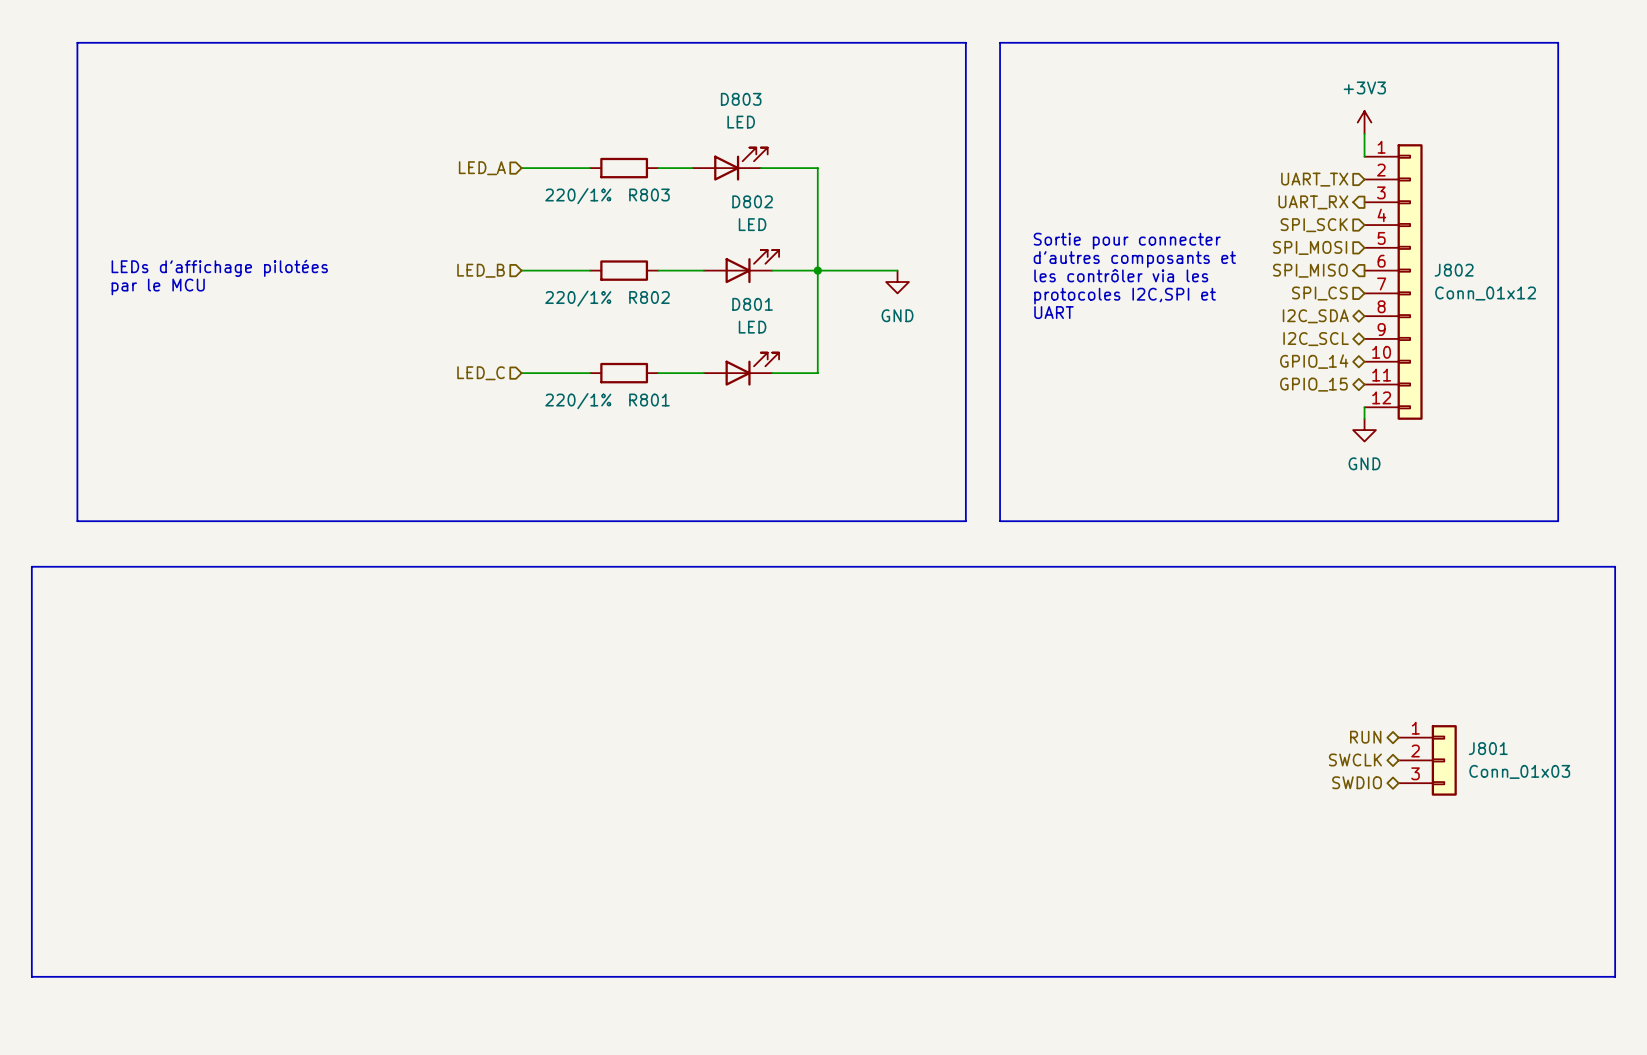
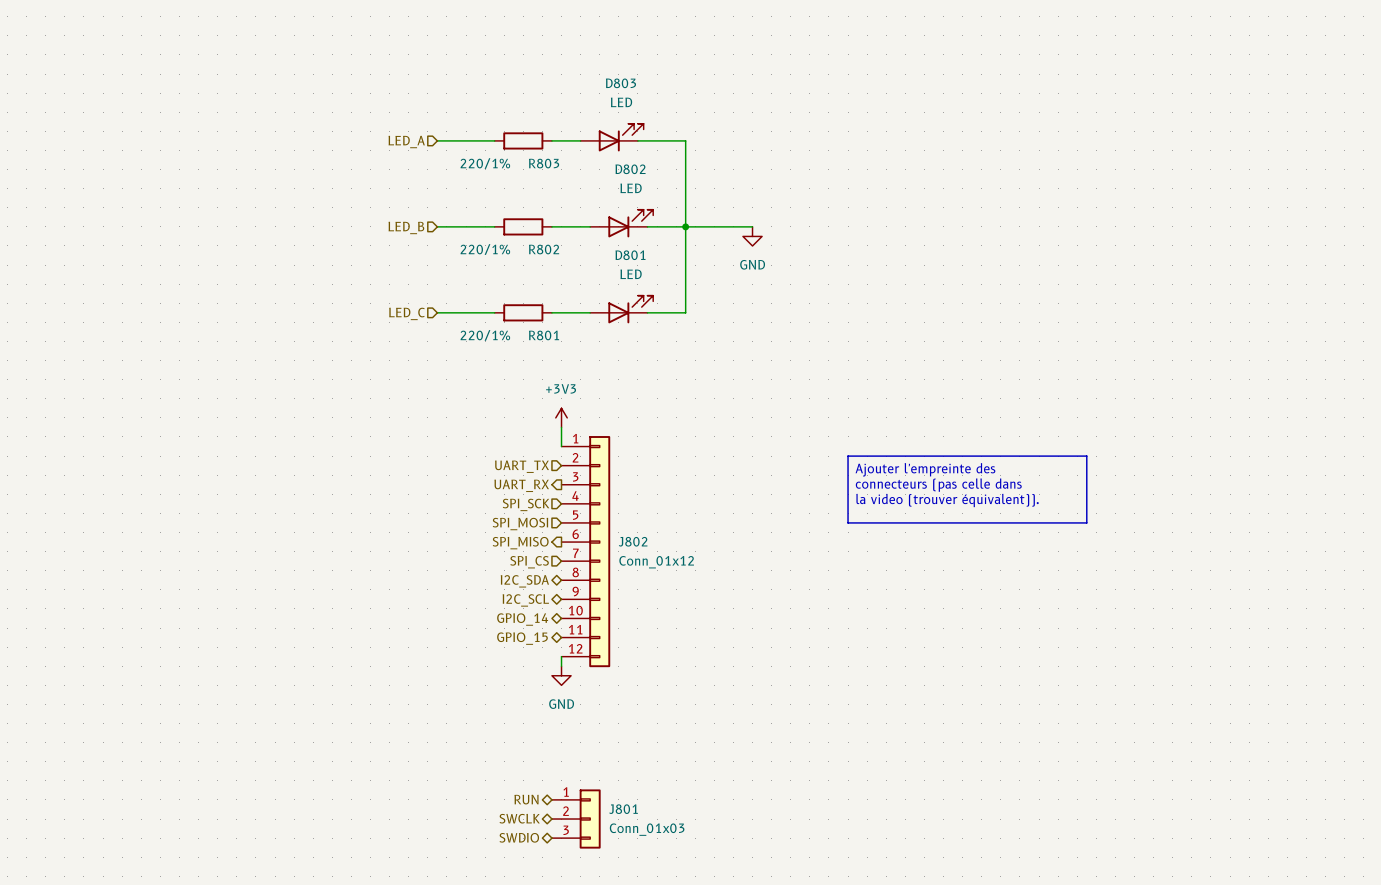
line: (77, 42) (965, 42) (965, 521) (77, 521) (77, 42) -> none
line: (1000, 42) (1558, 42) (1558, 521) (1000, 521) (1000, 42) -> none
power symbol: +3V3 (1364, 122) -> none
wire: (1364, 133) (1364, 156) -> none
hierarchical label: UART_TX (1314, 179) -> none
hierarchical label: UART_RX (1313, 202) -> none
hierarchical label: SPI_SCK (1314, 225) -> none
text: Sortie pour connecter (1127, 241) -> none
hierarchical label: SPI_MOSI (1310, 247) -> none
text: d'autres composants et (1134, 259) -> none
text: LEDs d'affichage pilotées (219, 268) -> none
hierarchical label: SPI_MISO (1310, 270) -> none
text: les contrôler via les (1121, 275) -> none
J802 position: (1393, 282) -> (585, 551)
text: par le MCU (158, 286) -> none
hierarchical label: SPI_CS (1319, 293) -> none
text: protocoles I2C,SPI et (1125, 296) -> none
text: UART (1053, 312) -> none
hierarchical label: I2C_SDA (1315, 316) -> none
hierarchical label: I2C_SCL (1316, 339) -> none
hierarchical label: GPIO_14 (1314, 361) -> none
hierarchical label: GPIO_15 (1313, 384) -> none
wire: (1364, 407) (1364, 418) -> none
power symbol: GND (1364, 430) -> none
power symbol: none -> +3V3 (561, 417)
wire: none -> (561, 427) (561, 446)
line: none -> (848, 456) (1086, 456) (1086, 522) (848, 522) (848, 456)
hierarchical label: none -> UART_TX (522, 466)
text: none -> Ajouter l'empreinte des (925, 469)
line: (31, 566) (1615, 566) (1615, 976) (31, 976) (31, 566) -> none
hierarchical label: none -> UART_RX (521, 485)
text: none -> connecteurs (pas celle dans (938, 485)
text: none -> la video (trouver équivalent)). (947, 500)
hierarchical label: none -> SPI_SCK (526, 504)
hierarchical label: none -> SPI_MOSI (520, 524)
hierarchical label: none -> SPI_MISO (520, 543)
hierarchical label: none -> SPI_CS (529, 562)
hierarchical label: none -> I2C_SDA (524, 581)
hierarchical label: none -> I2C_SCL (525, 600)
hierarchical label: none -> GPIO_14 (522, 619)
hierarchical label: RUN (1365, 737) -> none
hierarchical label: SWCLK (1355, 759) -> none
hierarchical label: none -> GPIO_15 (522, 638)
J801 position: (1427, 760) -> (576, 819)
hierarchical label: SWDIO (1357, 782) -> none
wire: none -> (561, 656) (561, 666)
power symbol: none -> GND (561, 675)
hierarchical label: none -> RUN (526, 799)
hierarchical label: none -> SWCLK (519, 818)
hierarchical label: none -> SWDIO (519, 837)

